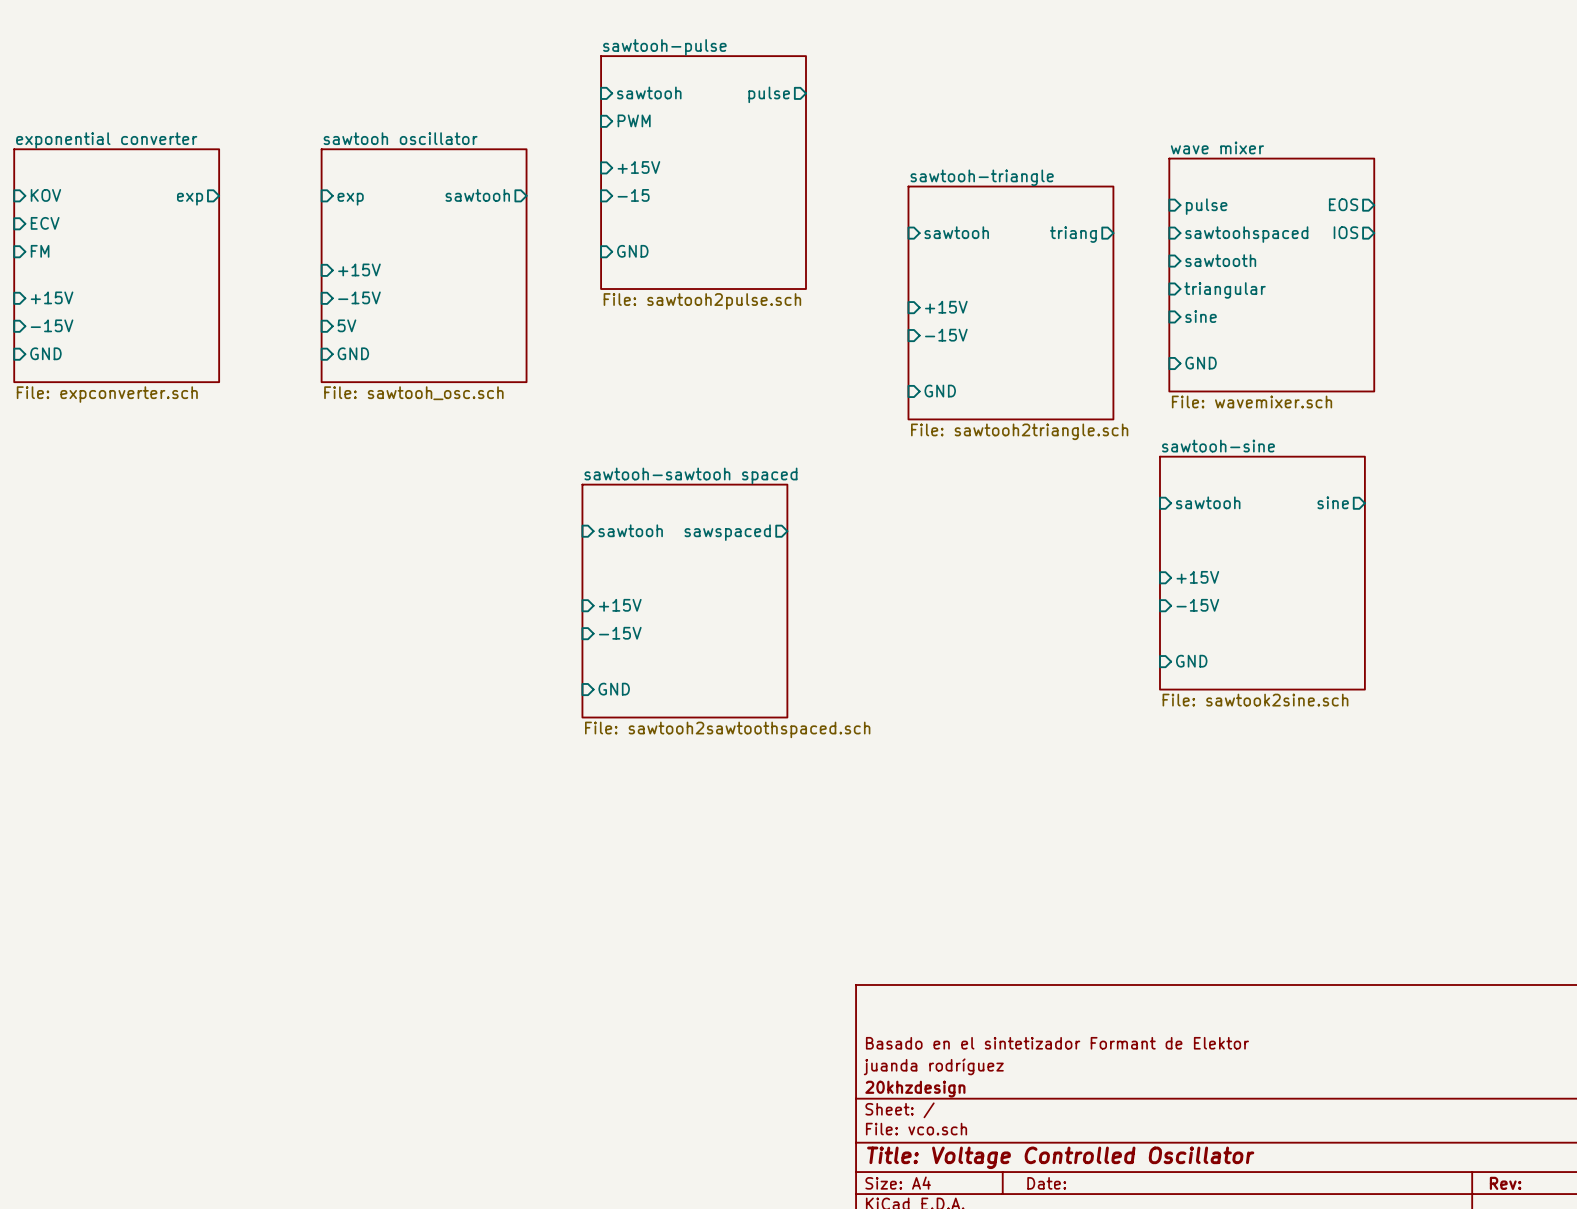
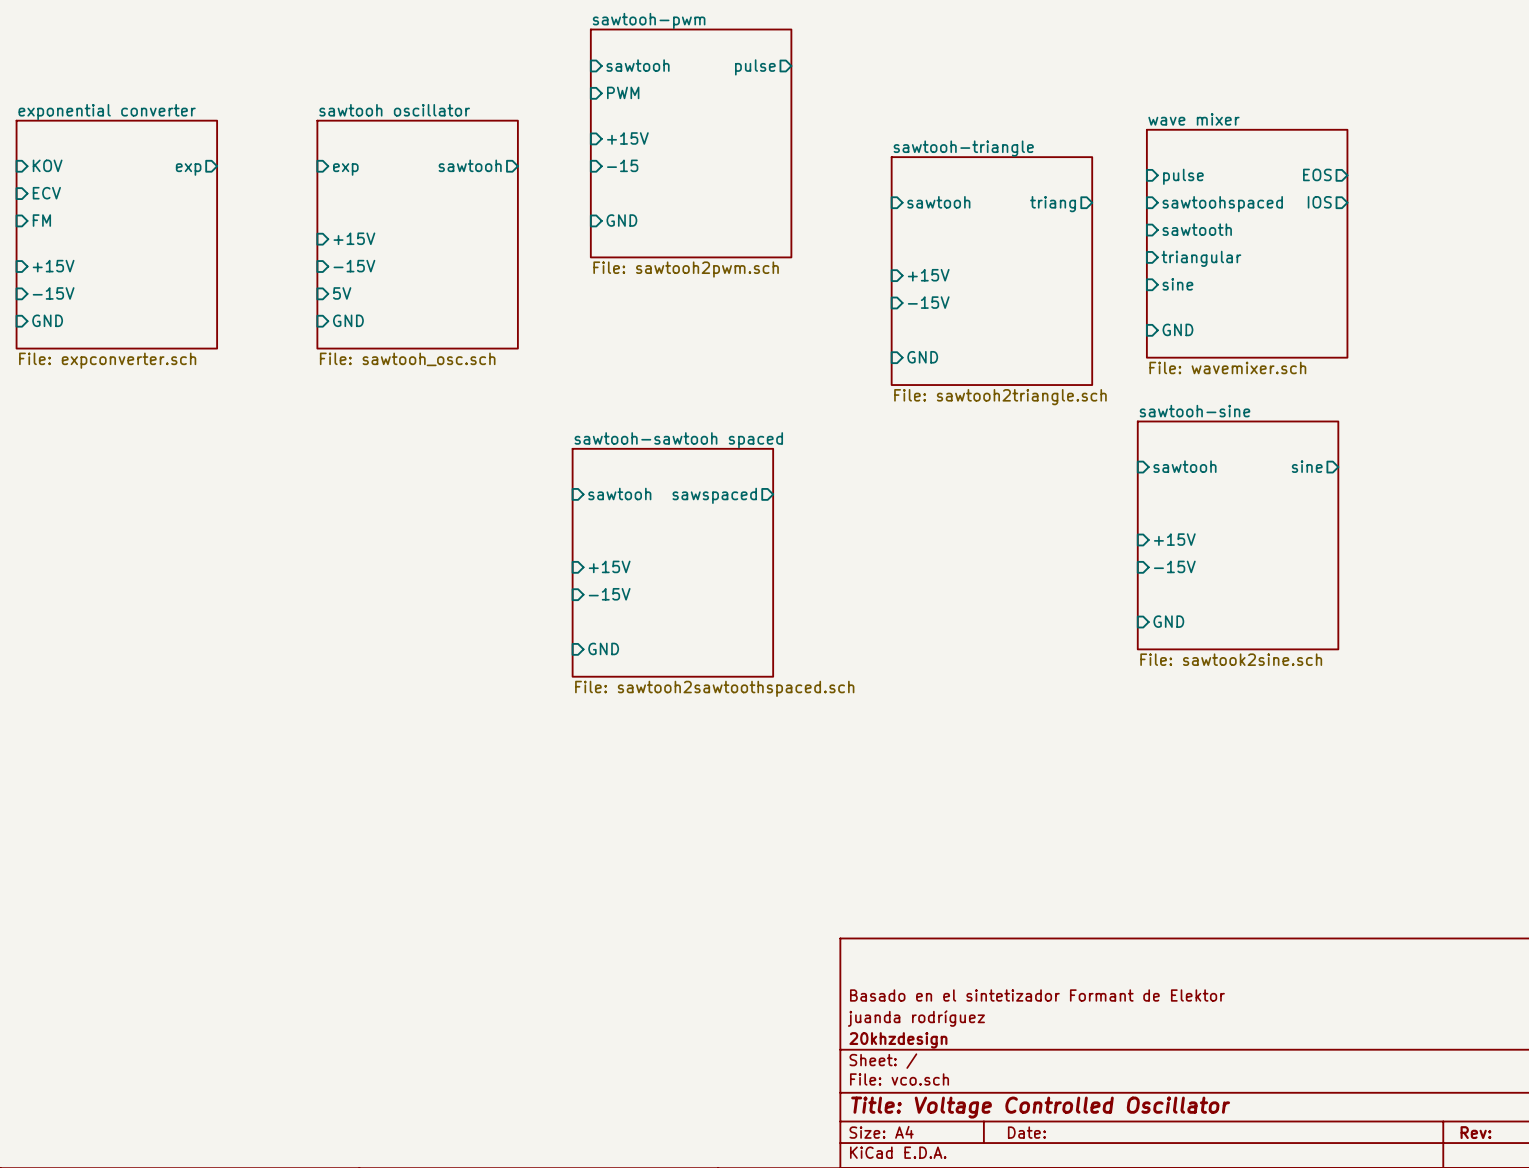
sheet sawtooh-pulse name: sawtooh-pulse (664, 47) -> sawtooh-pwm (649, 20)
sheet sawtooh-pulse value: File: sawtooh2pulse.sch (702, 301) -> File: sawtooh2pwm.sch (686, 269)

